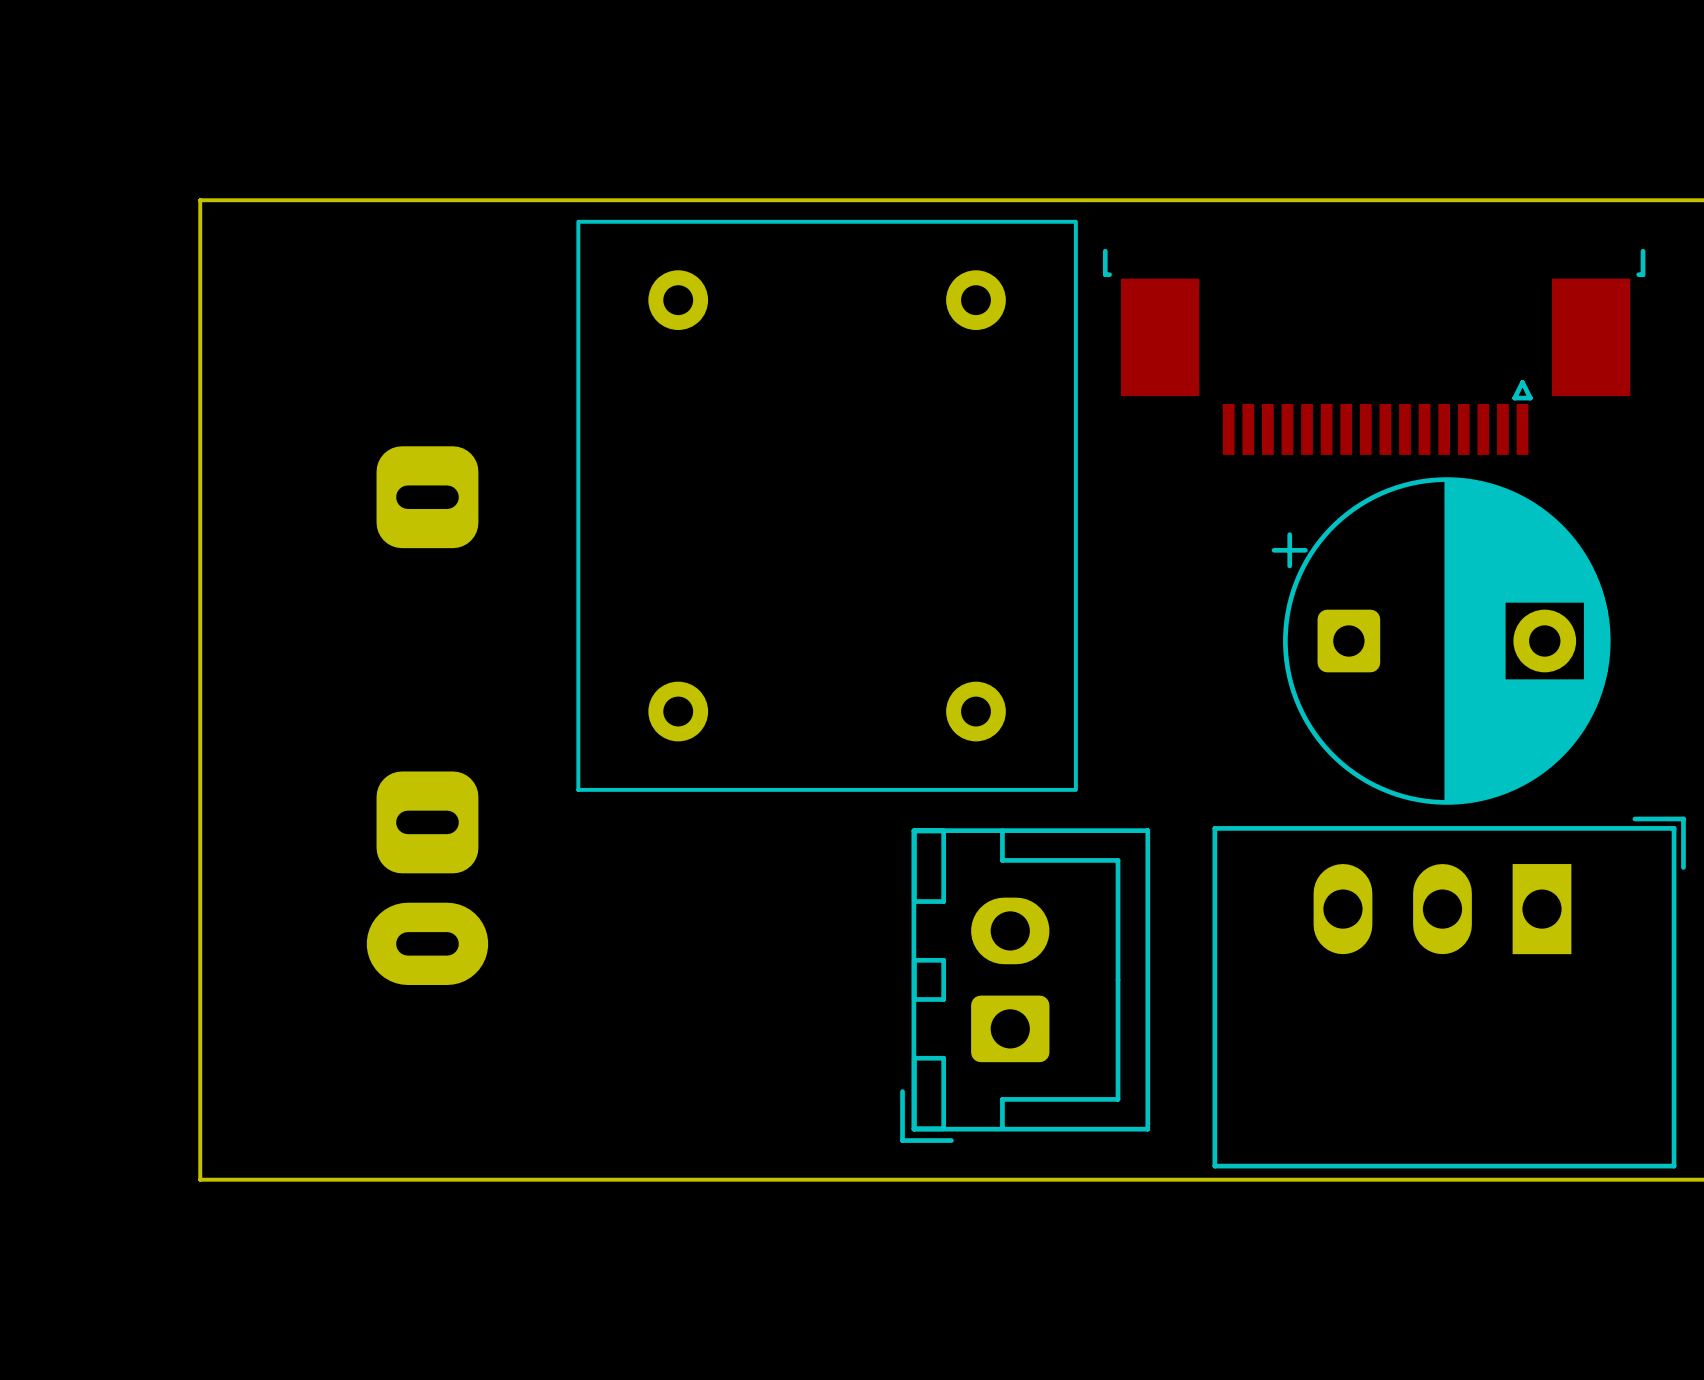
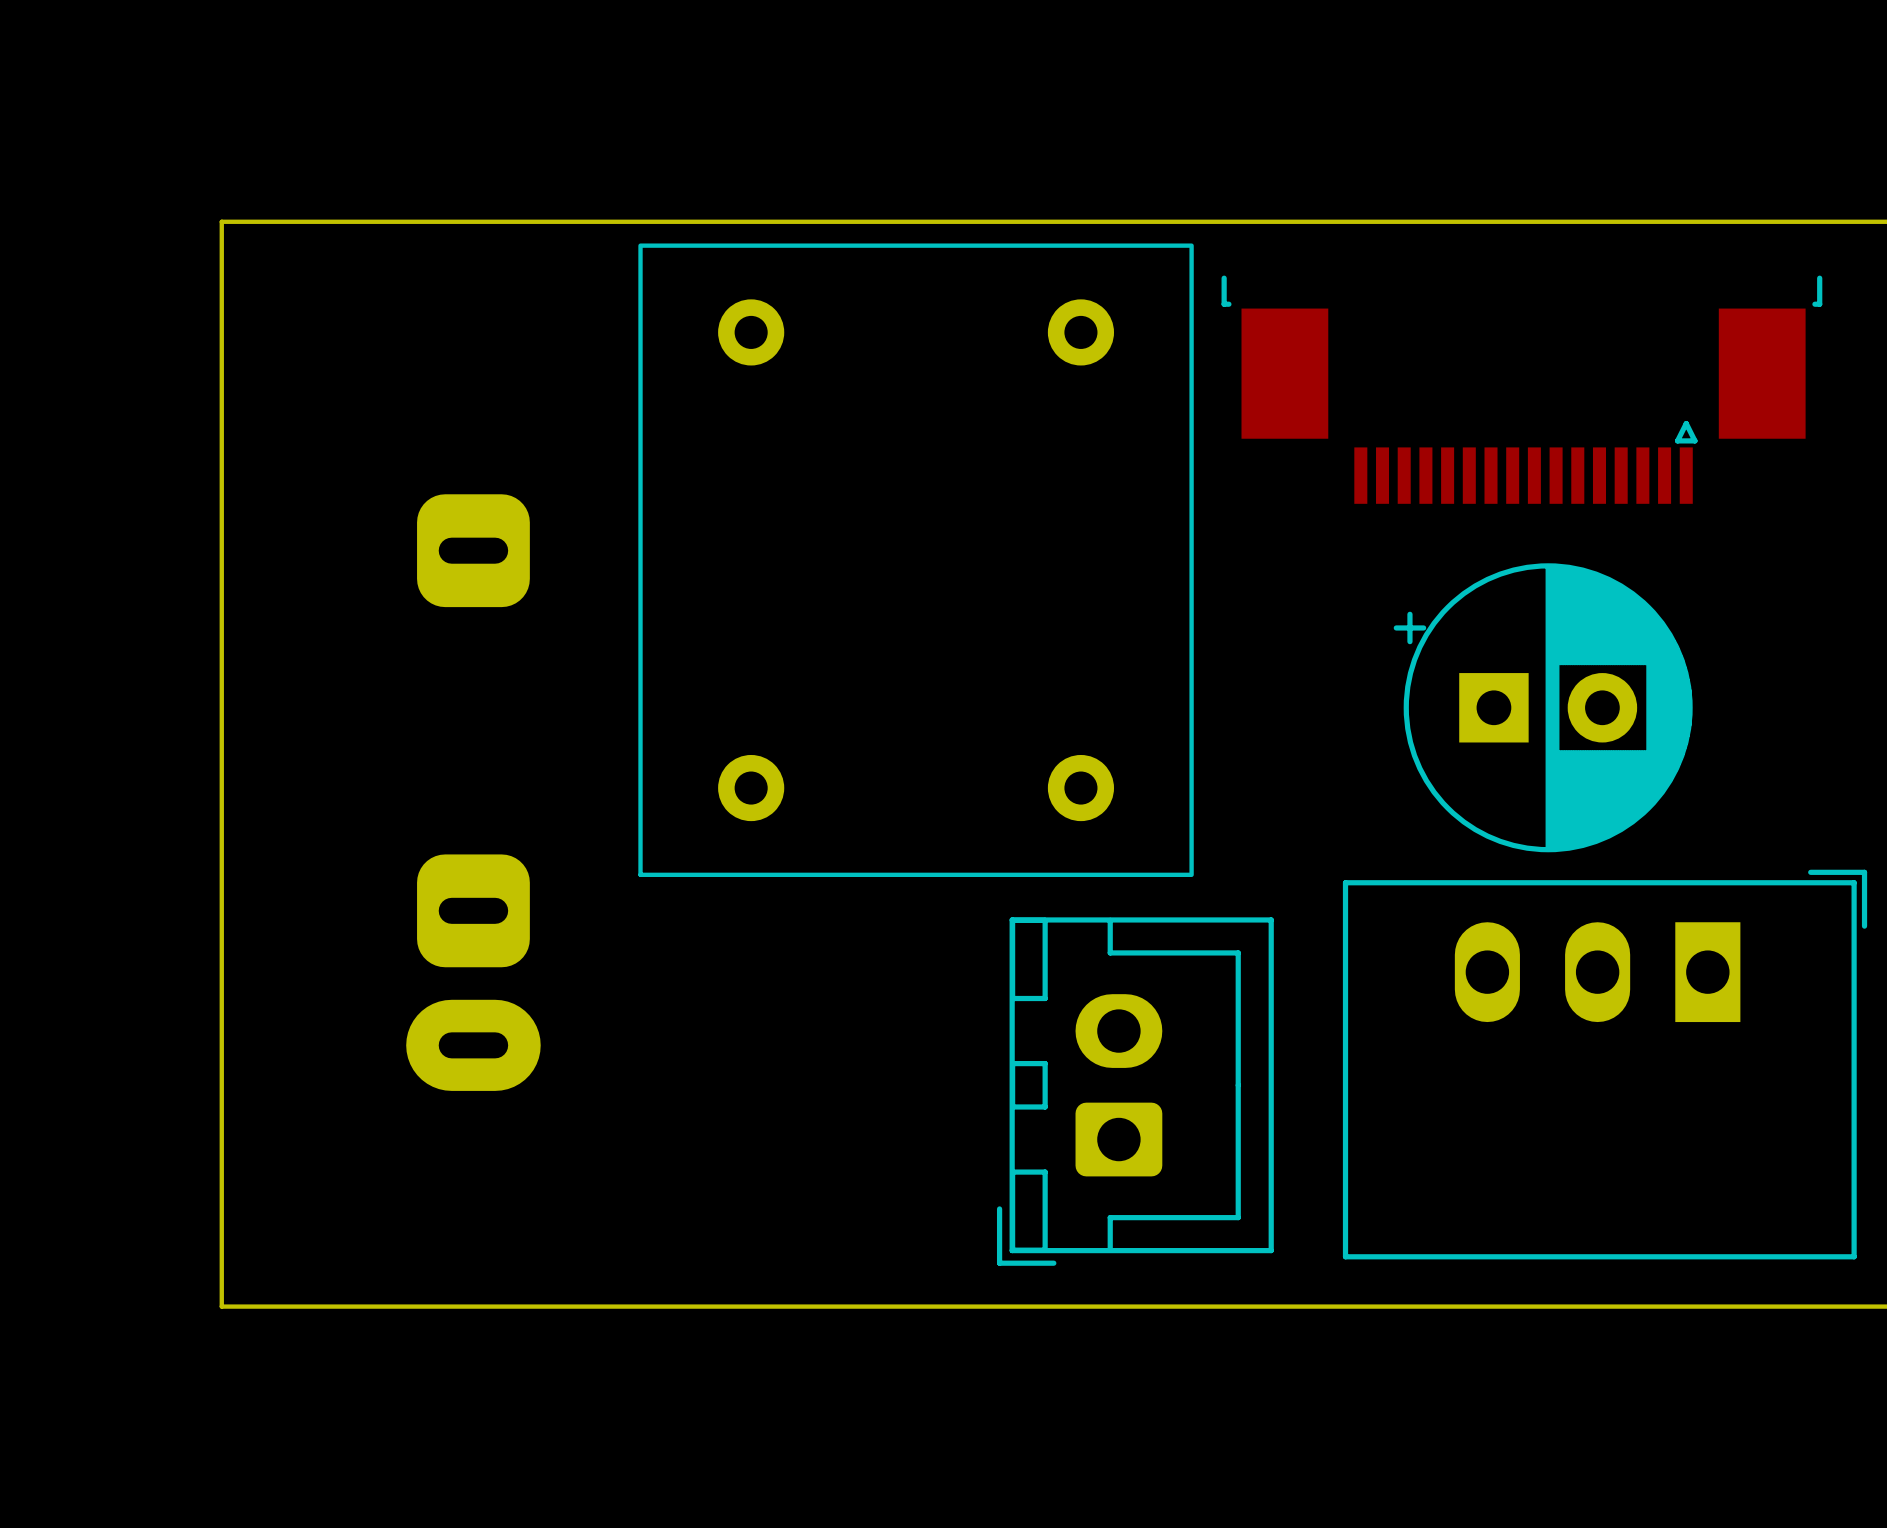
part: none -> (1543, 707)
part: (1441, 641) -> none
part position: (1449, 992) -> (1605, 1064)

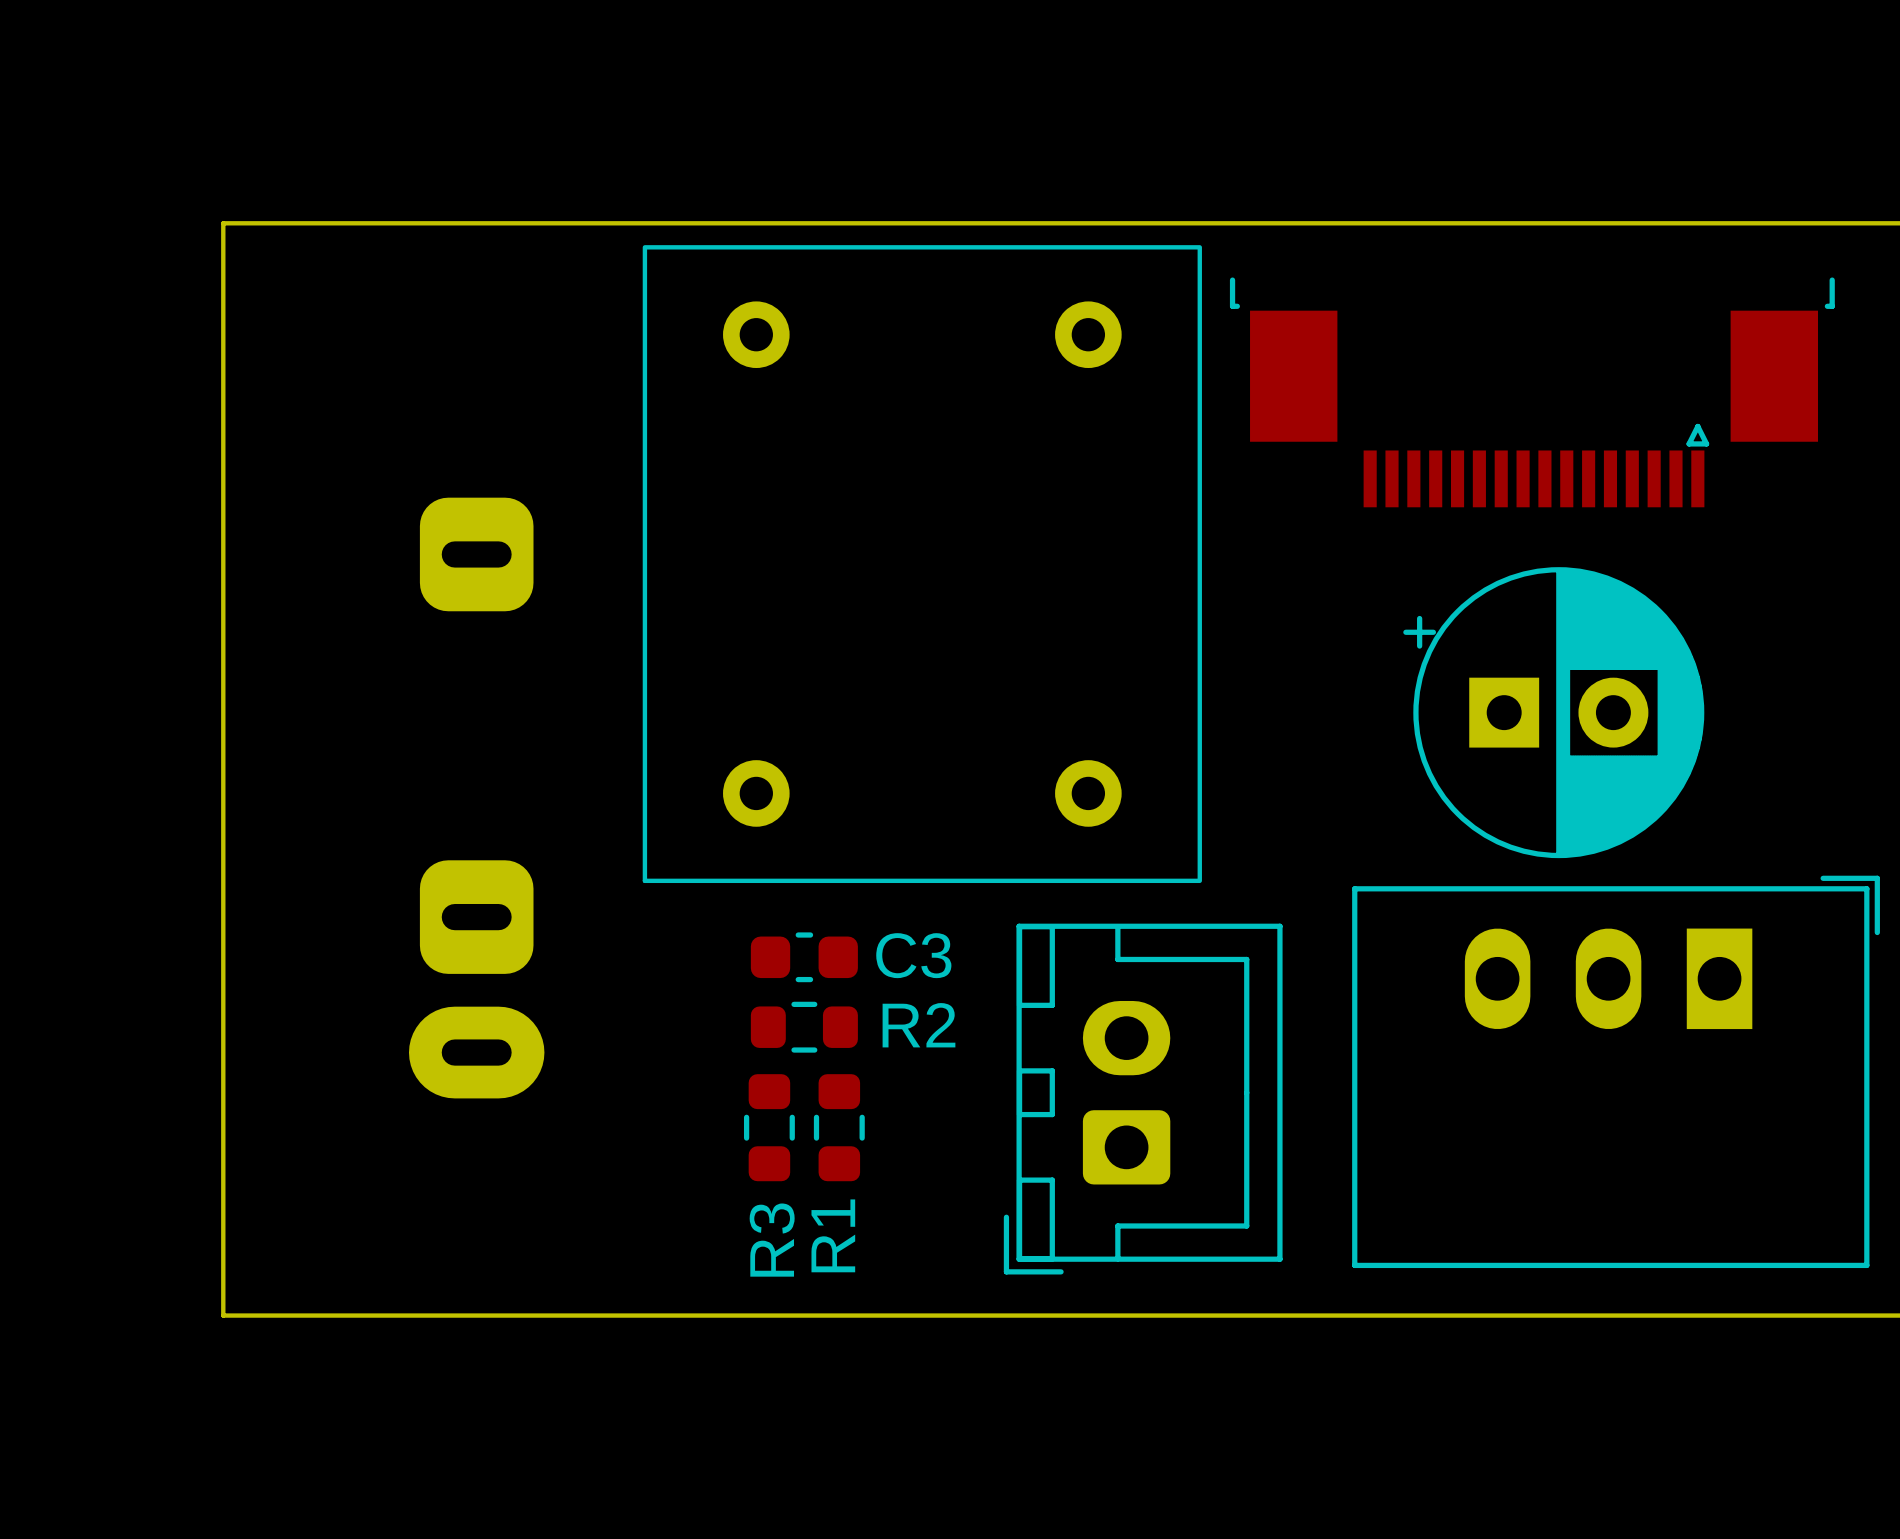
C3: none -> (804, 957)
R2: none -> (804, 1027)
R3: none -> (769, 1127)
R1: none -> (839, 1127)

